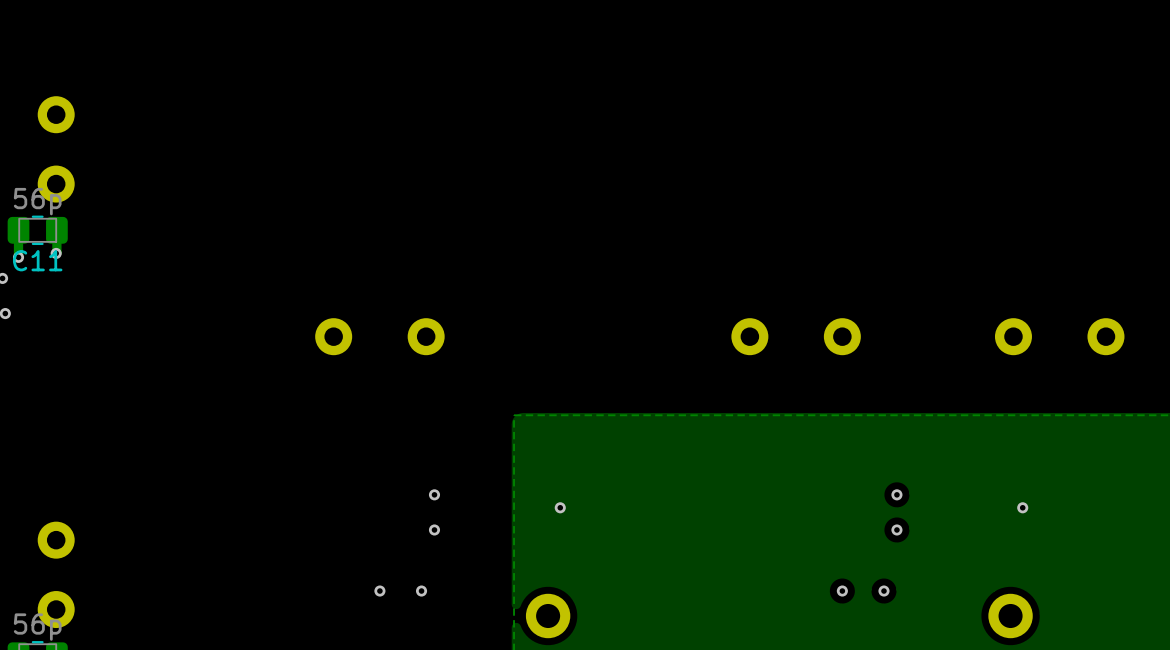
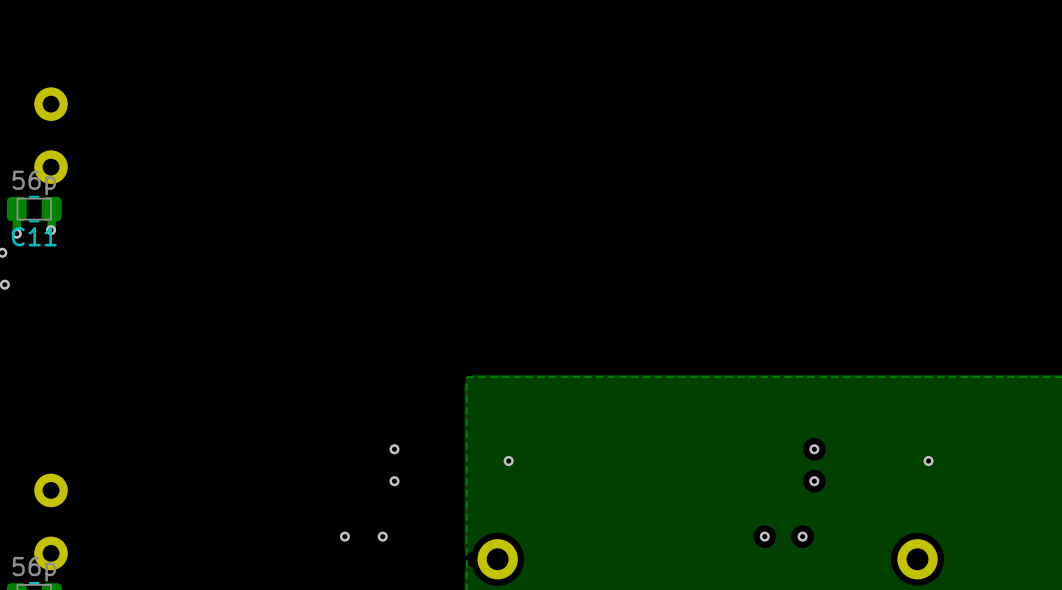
part: (333, 336) -> none
part: (426, 336) -> none
part: (749, 336) -> none
part: (842, 336) -> none
part: (1013, 336) -> none
part: (1105, 336) -> none

